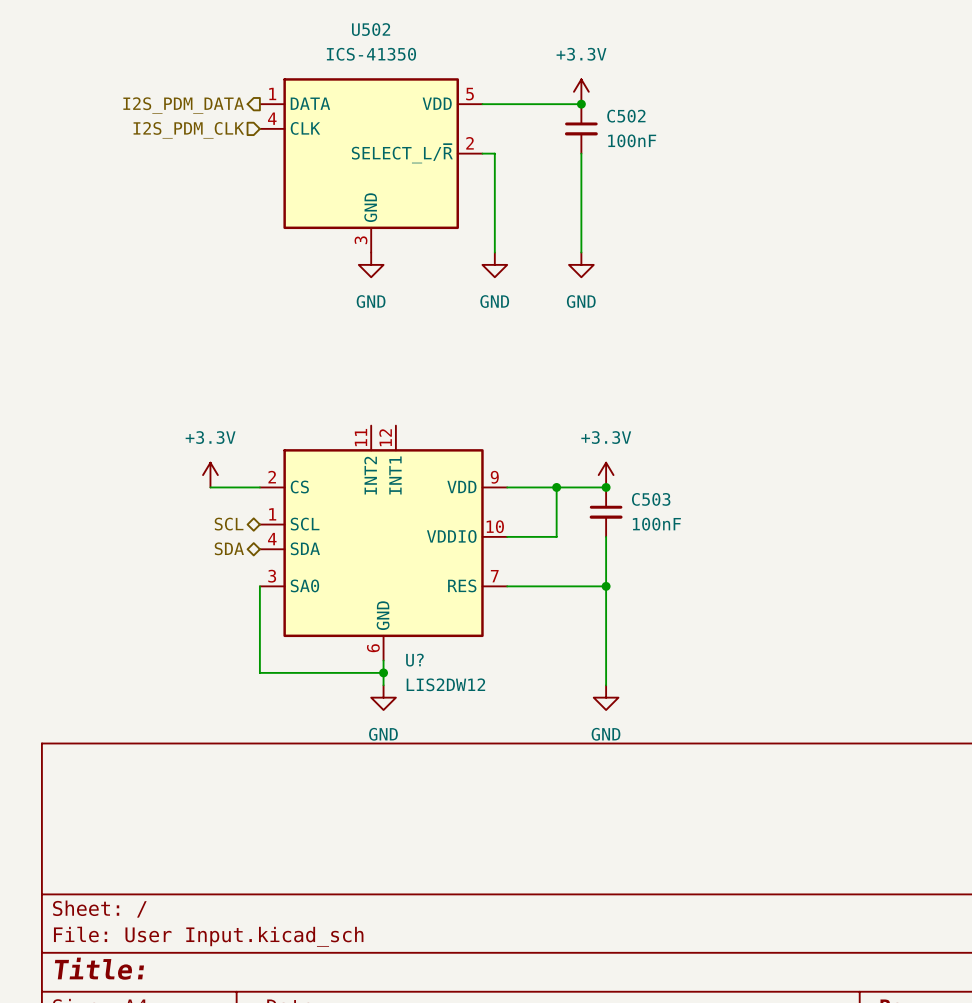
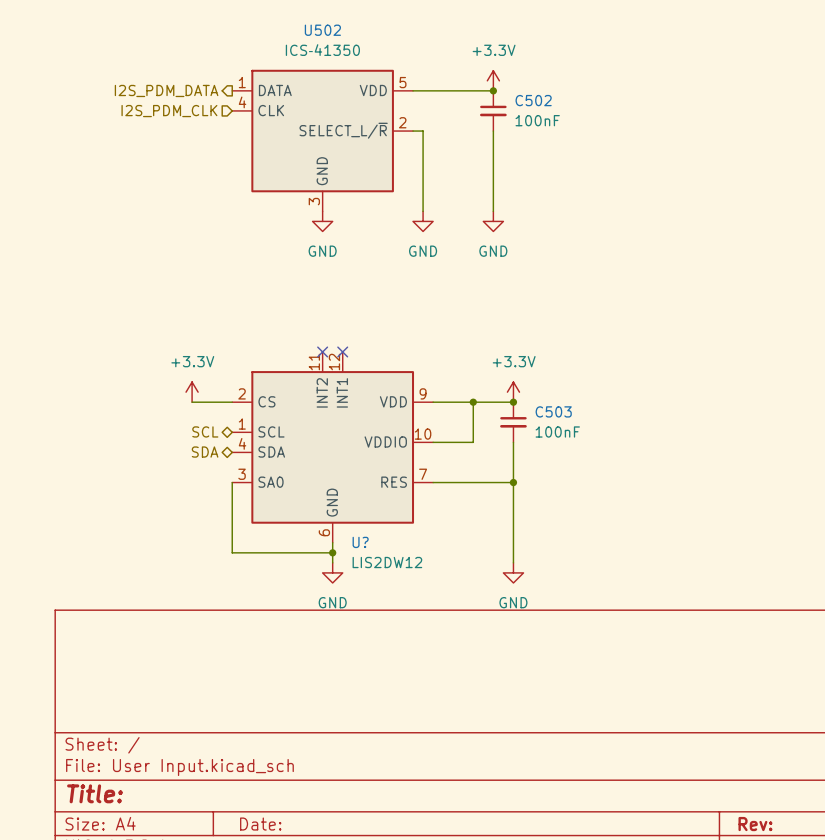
no-connect mark: none -> (322, 351)
no-connect mark: none -> (342, 351)

